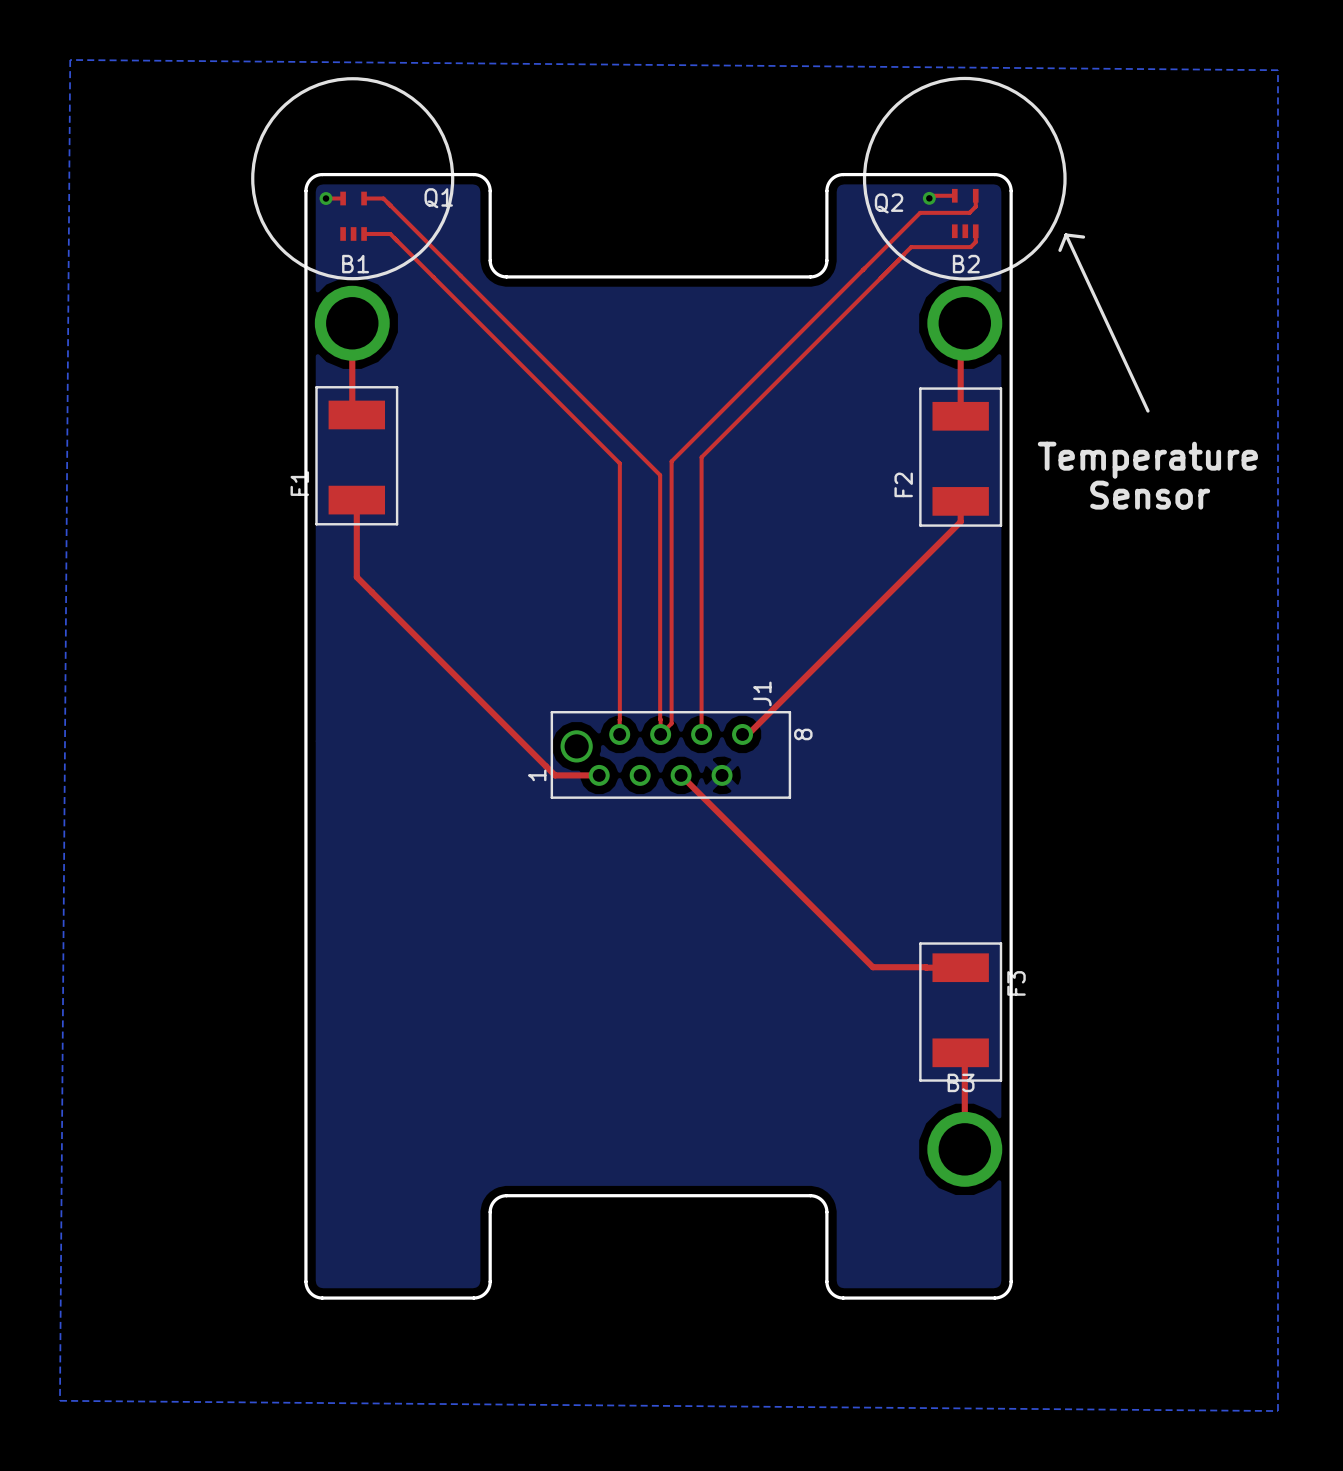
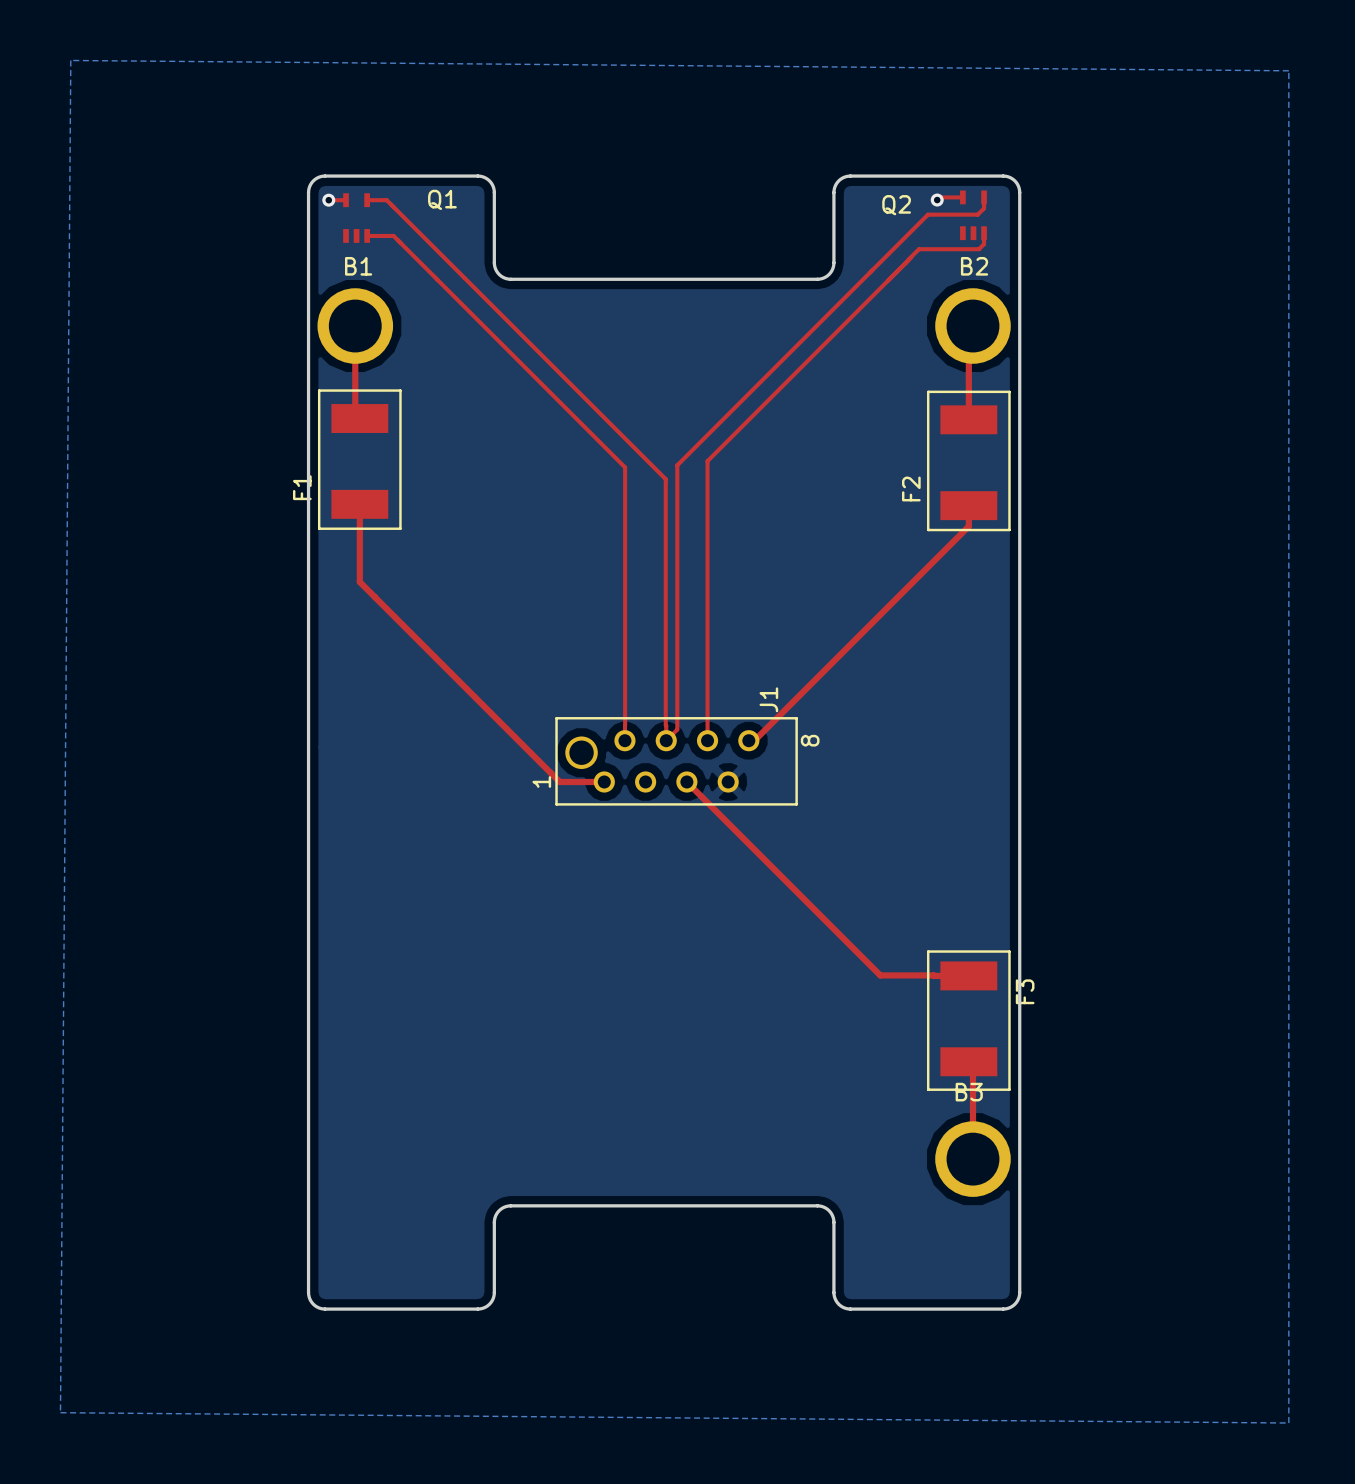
drawing: [862, 76, 1067, 281] -> none
drawing: [251, 77, 455, 281] -> none
line: (1066, 235) (1059, 250) -> none
line: (1066, 235) (1083, 237) -> none
line: (1066, 235) (1148, 411) -> none
text: Temperature (1147, 460) -> none
text: Sensor (1150, 495) -> none

